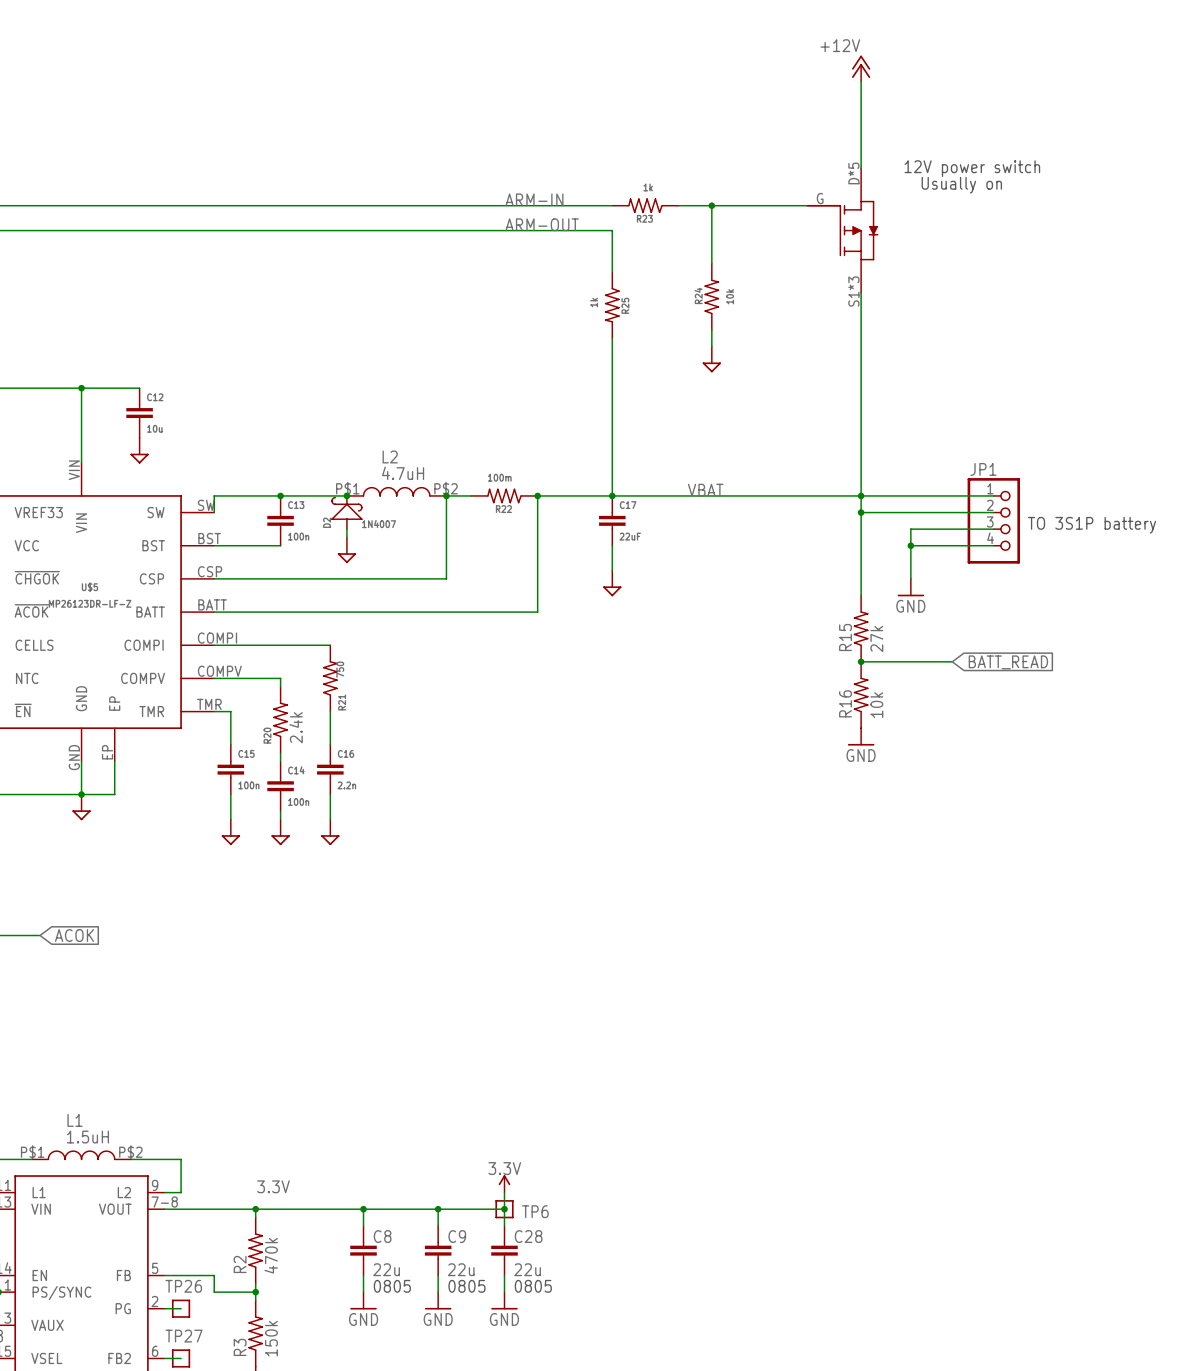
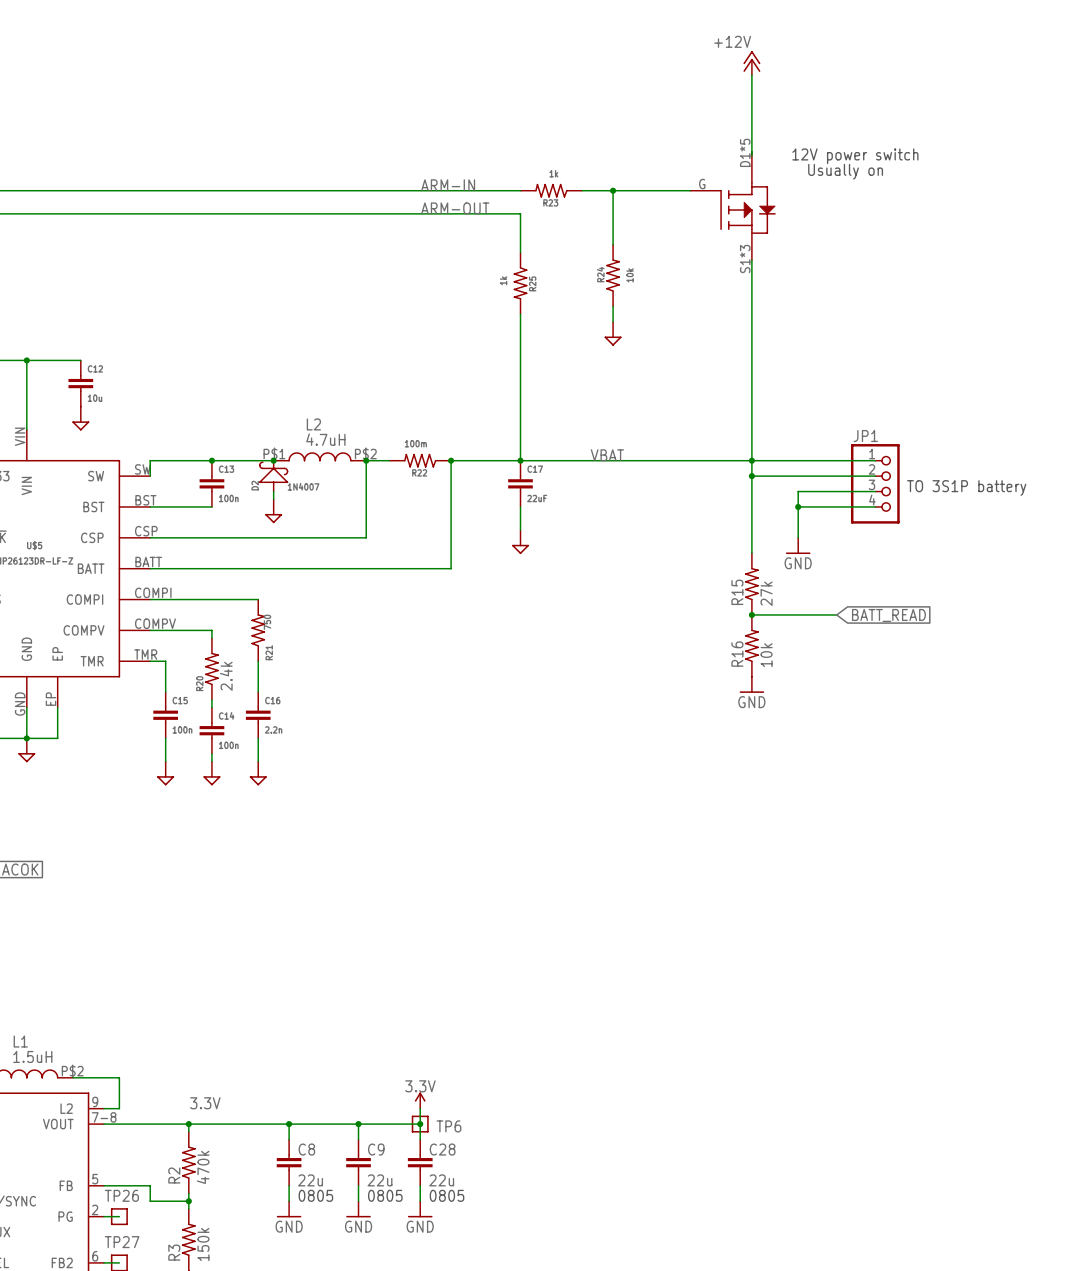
part: none -> (732, 206)
part: (842, 230) -> none

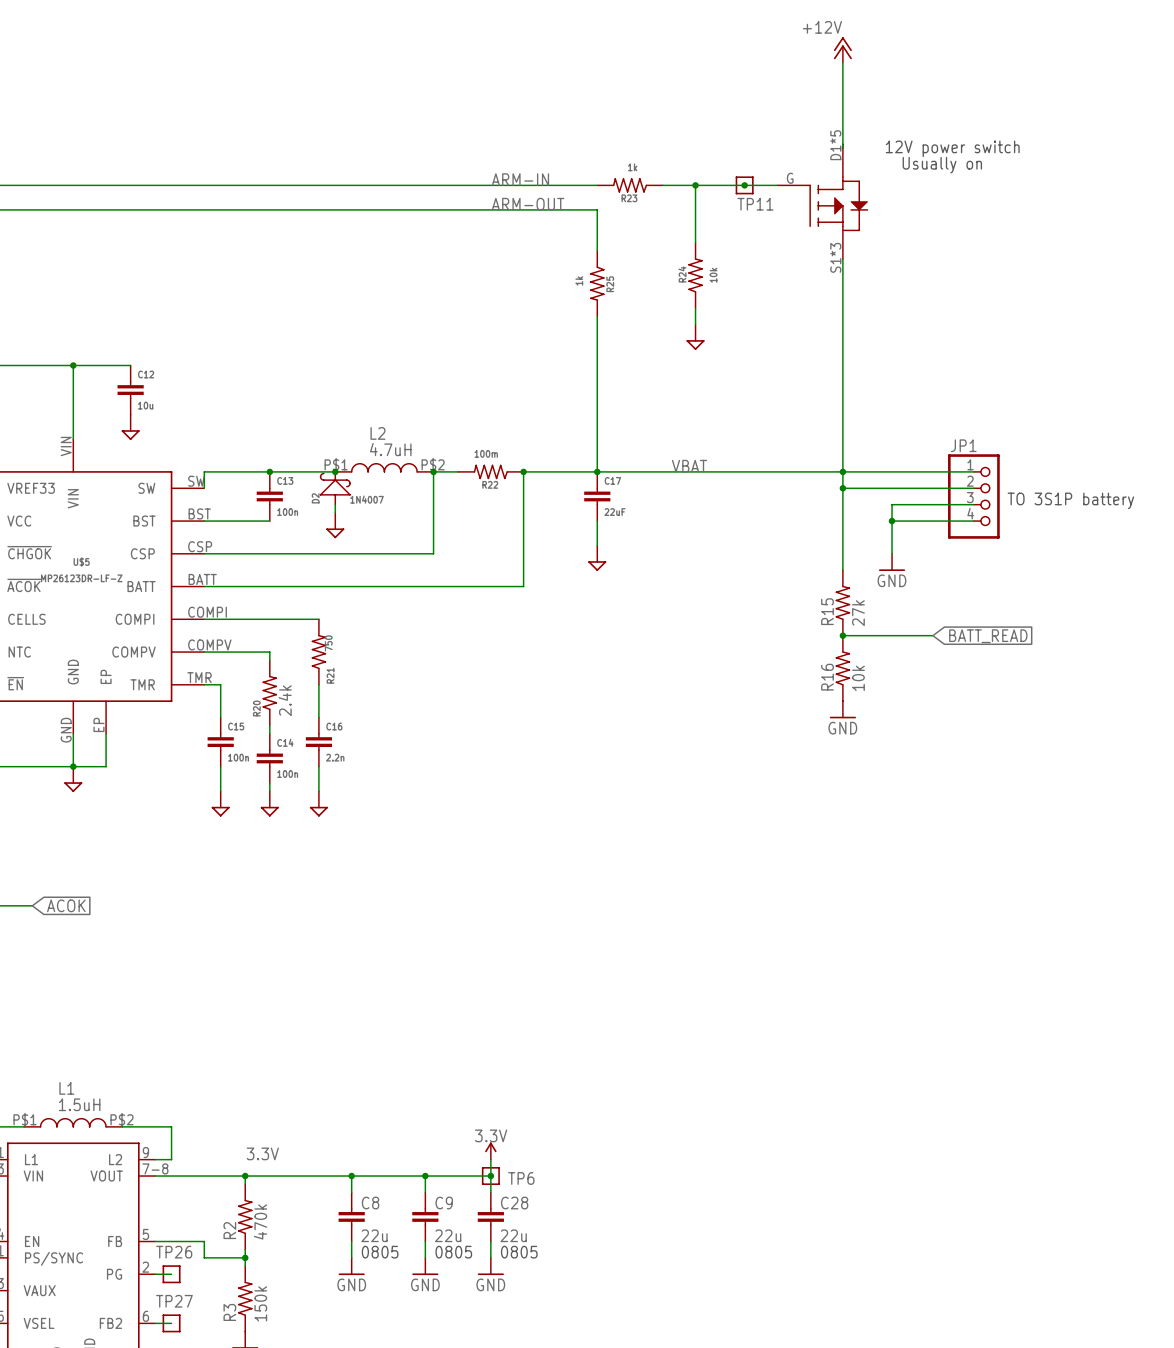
TP11: none -> (744, 185)
junction: none -> (744, 185)

